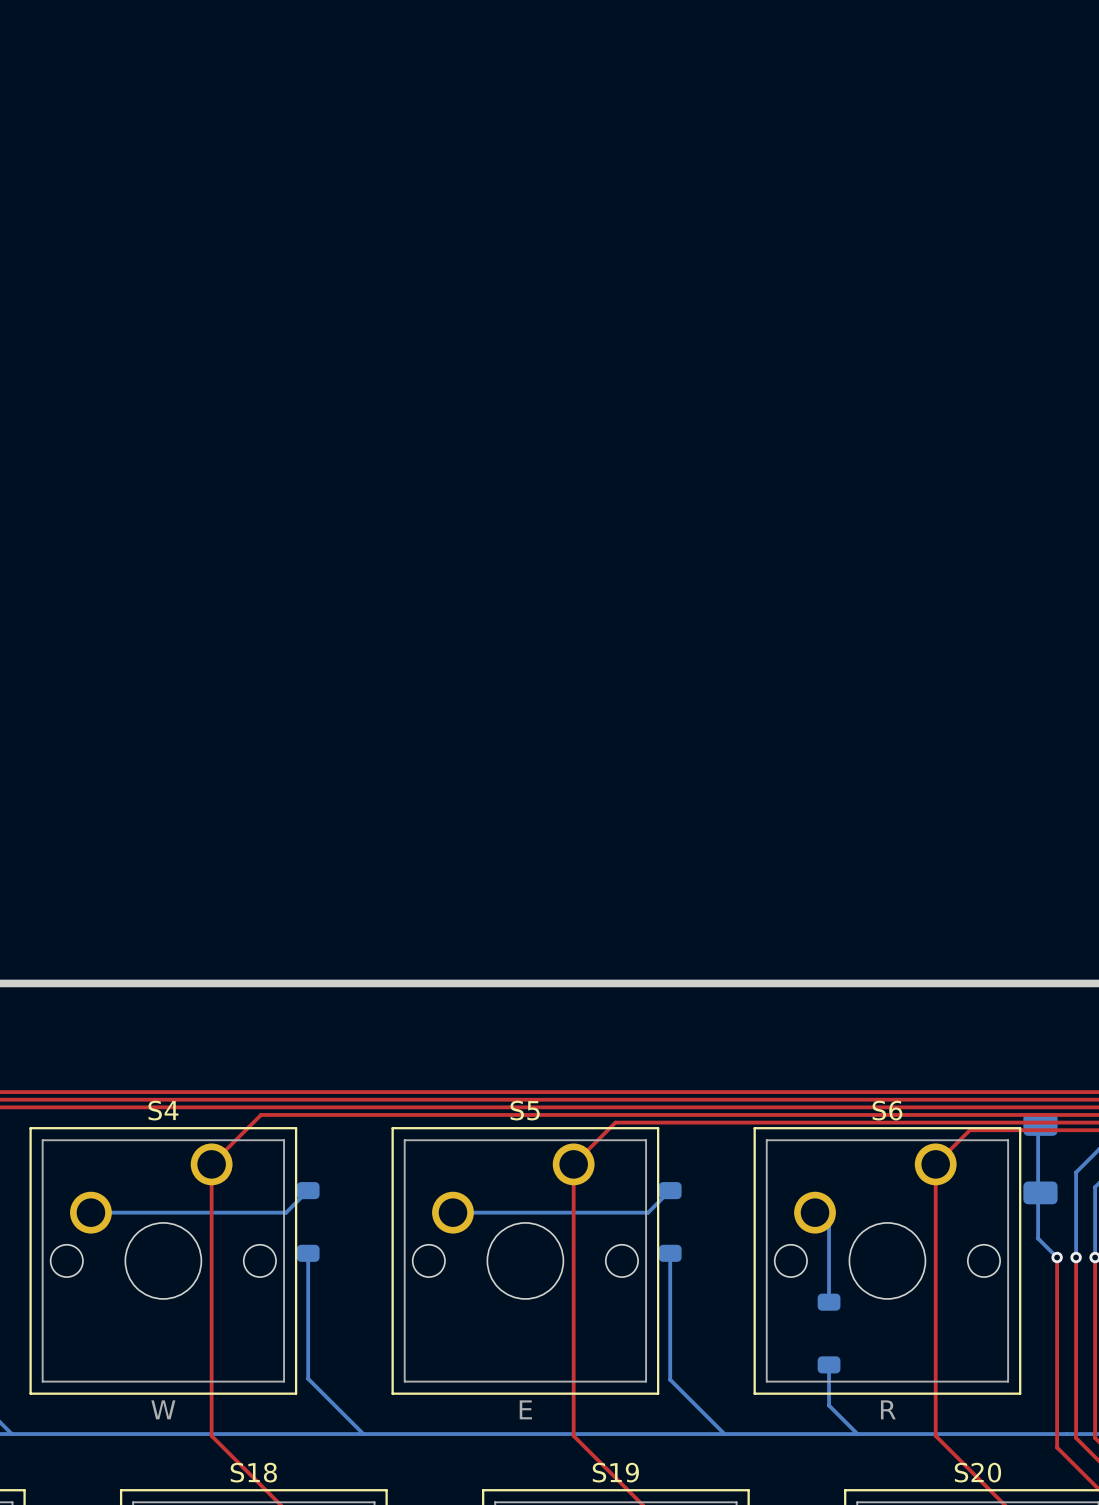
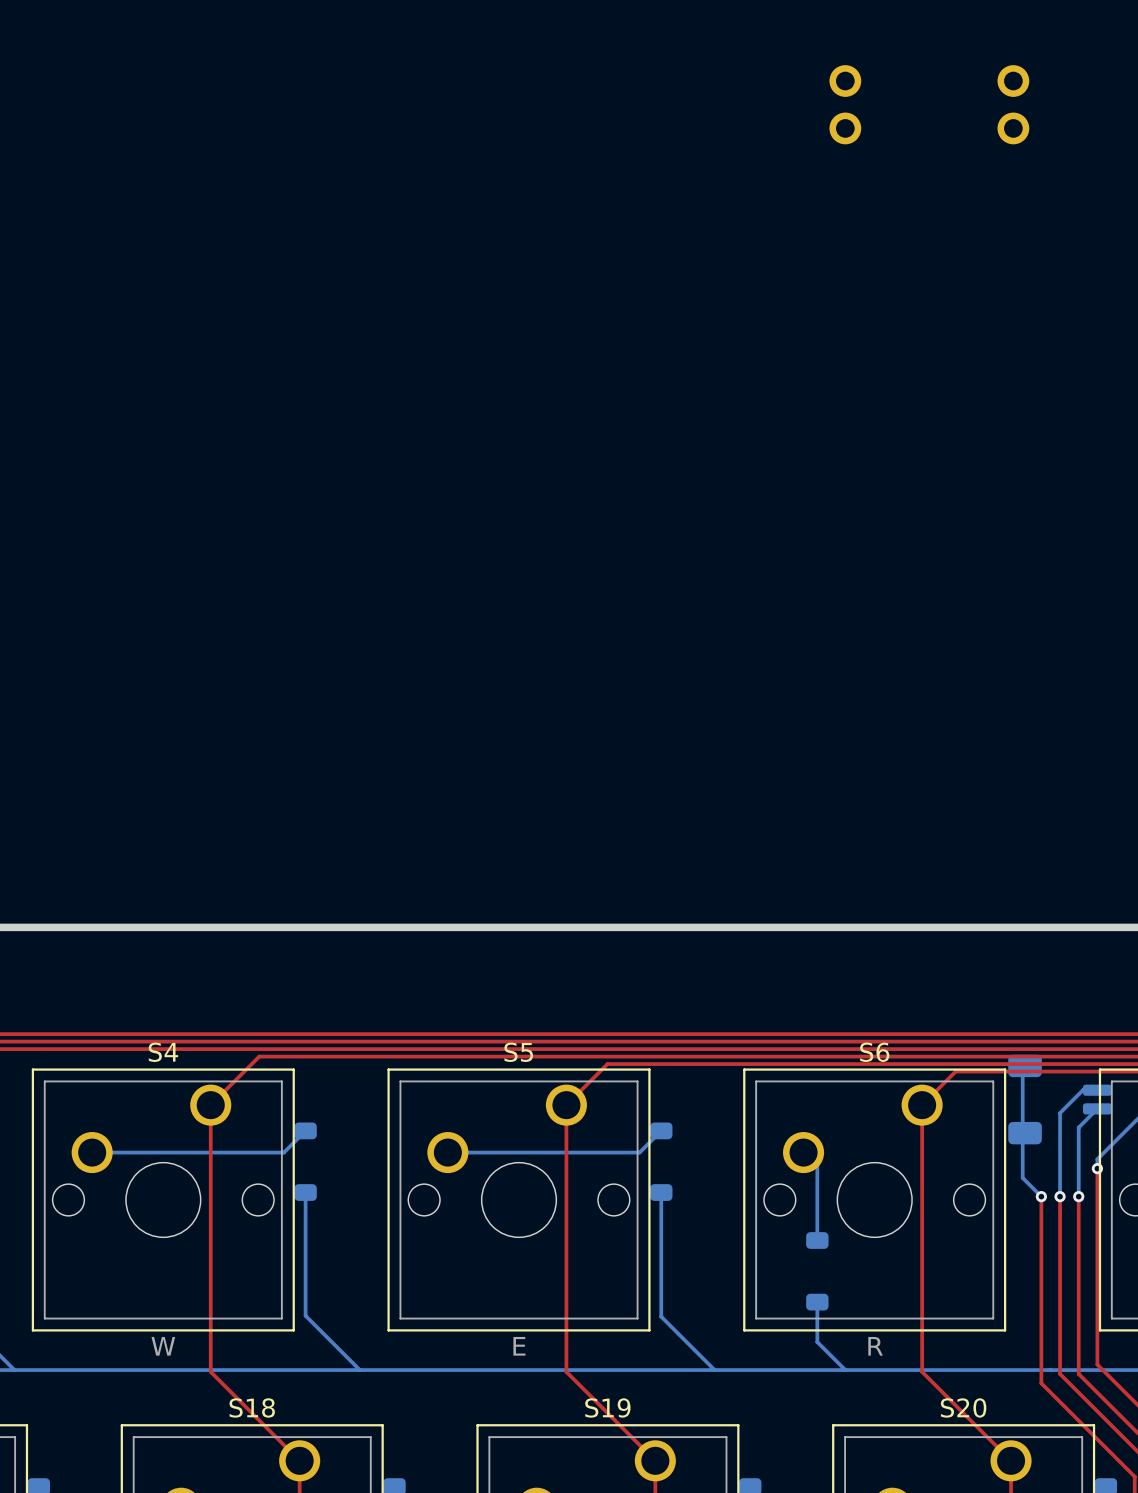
part: none -> (845, 104)
part: none -> (1013, 104)

